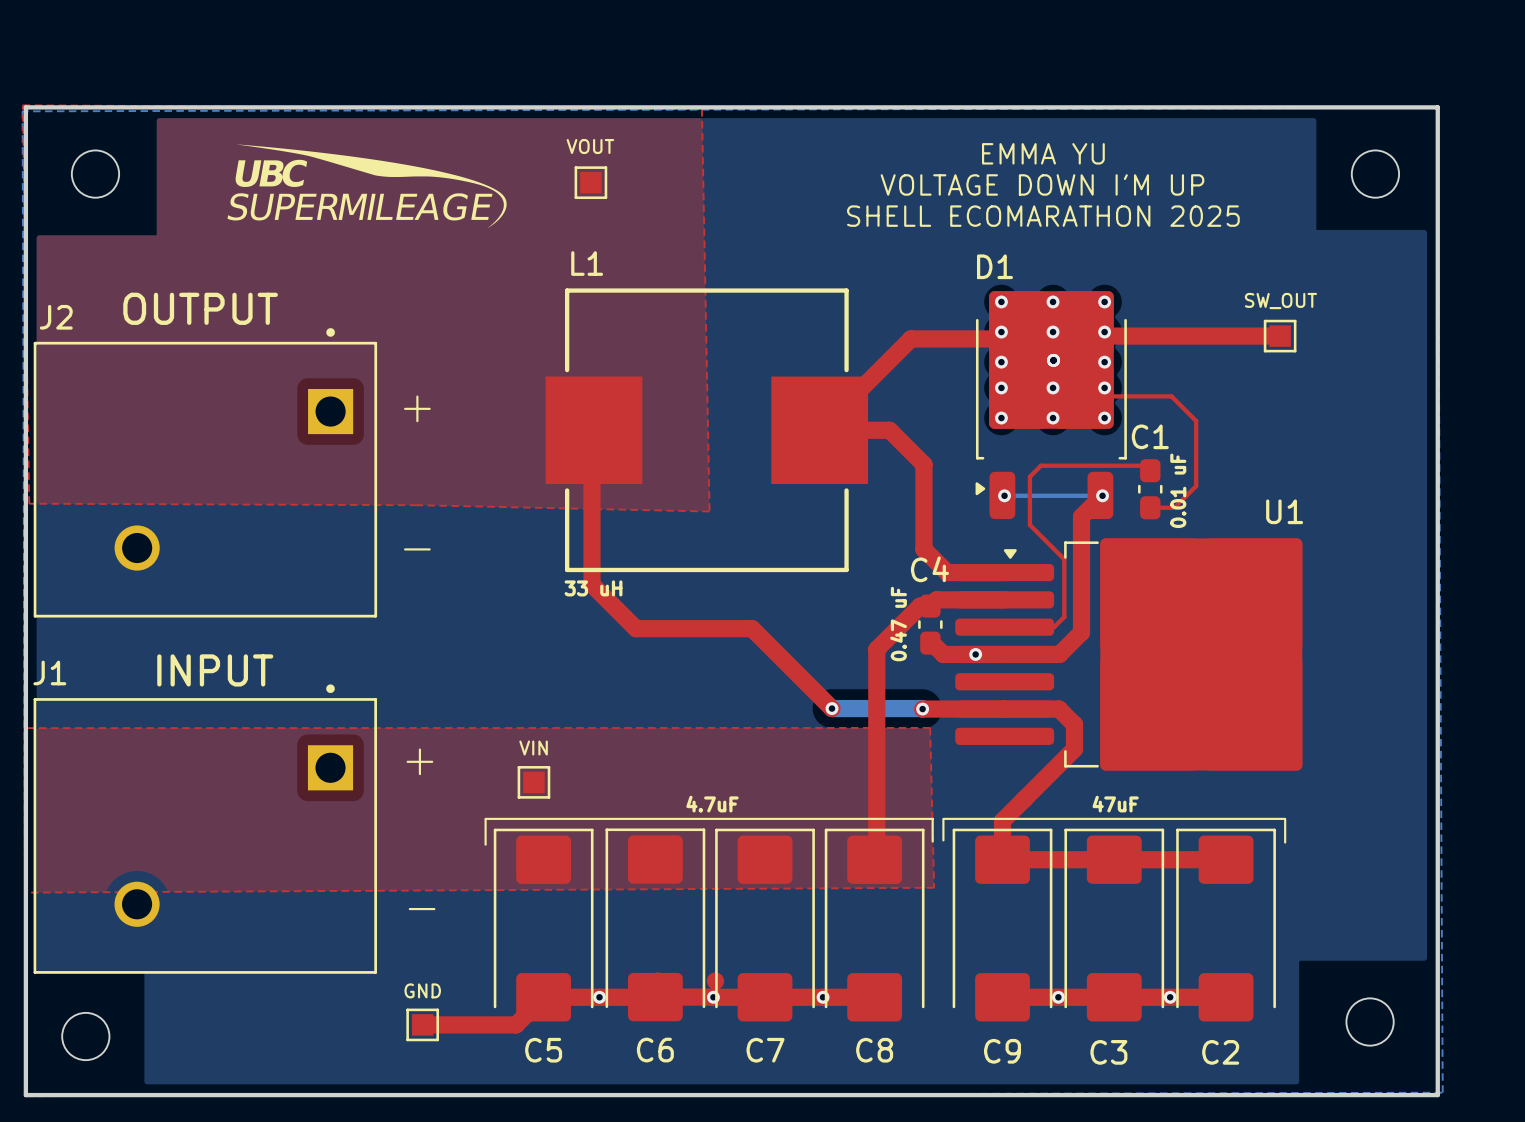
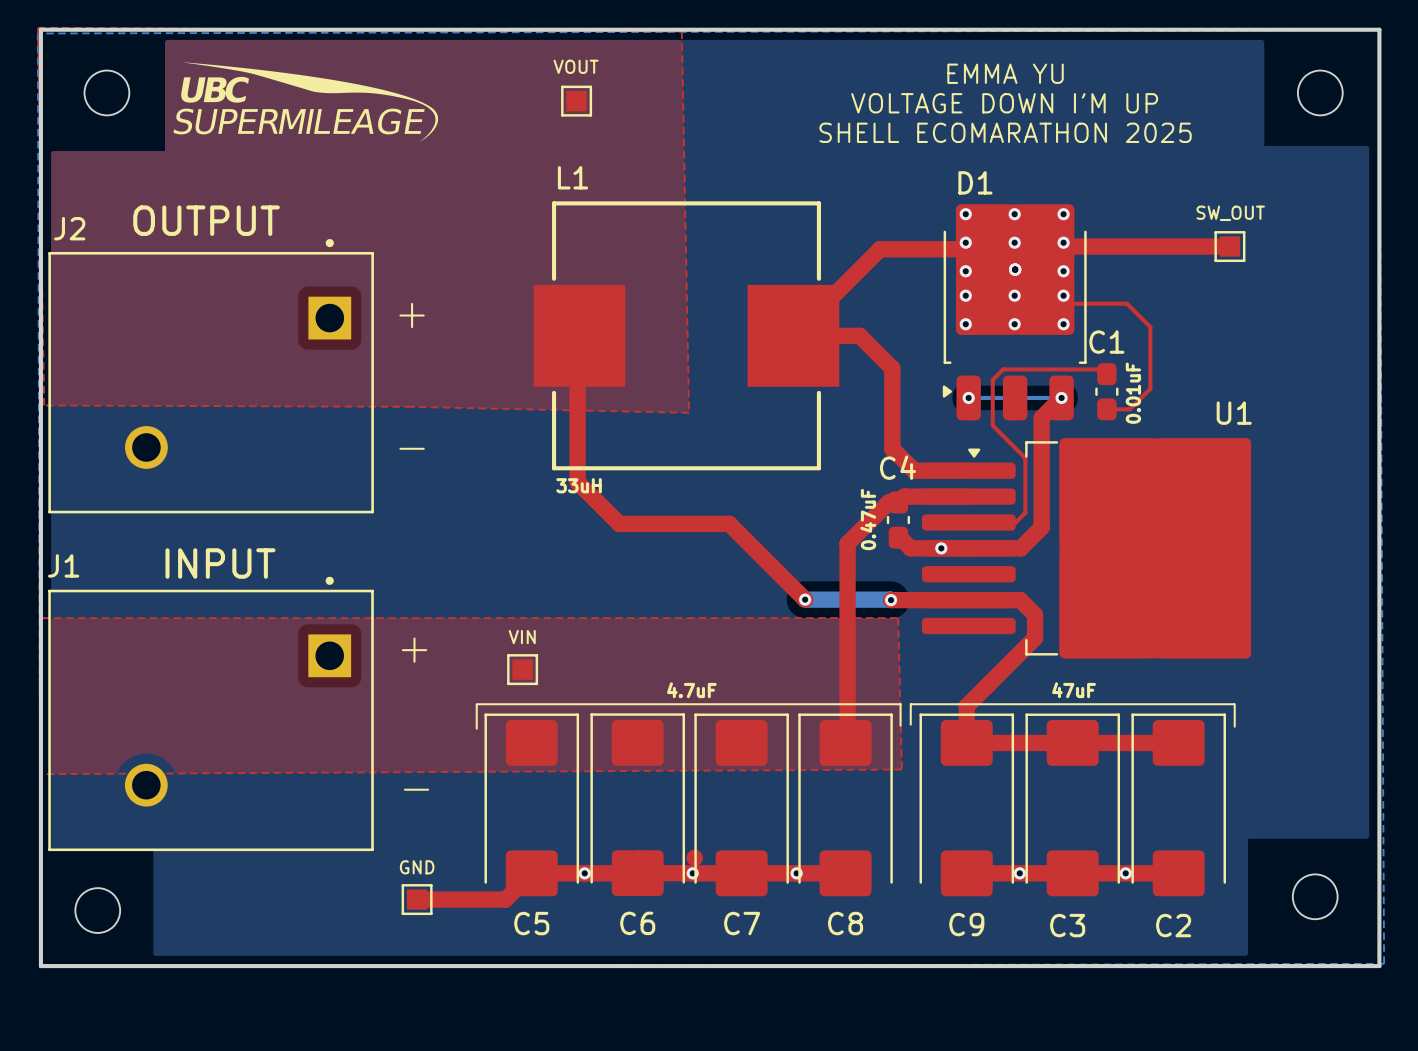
drawing position: (367, 186) -> (305, 102)
D1 footprint: [975, 291, 1127, 520] -> [942, 204, 1087, 421]
C1 value: 0.01 uF (1178, 490) -> 0.01uF (1133, 393)
L1 value: 33 uH (593, 588) -> 33uH (579, 485)
C4 value: 0.47 uF (898, 624) -> 0.47uF (868, 519)

